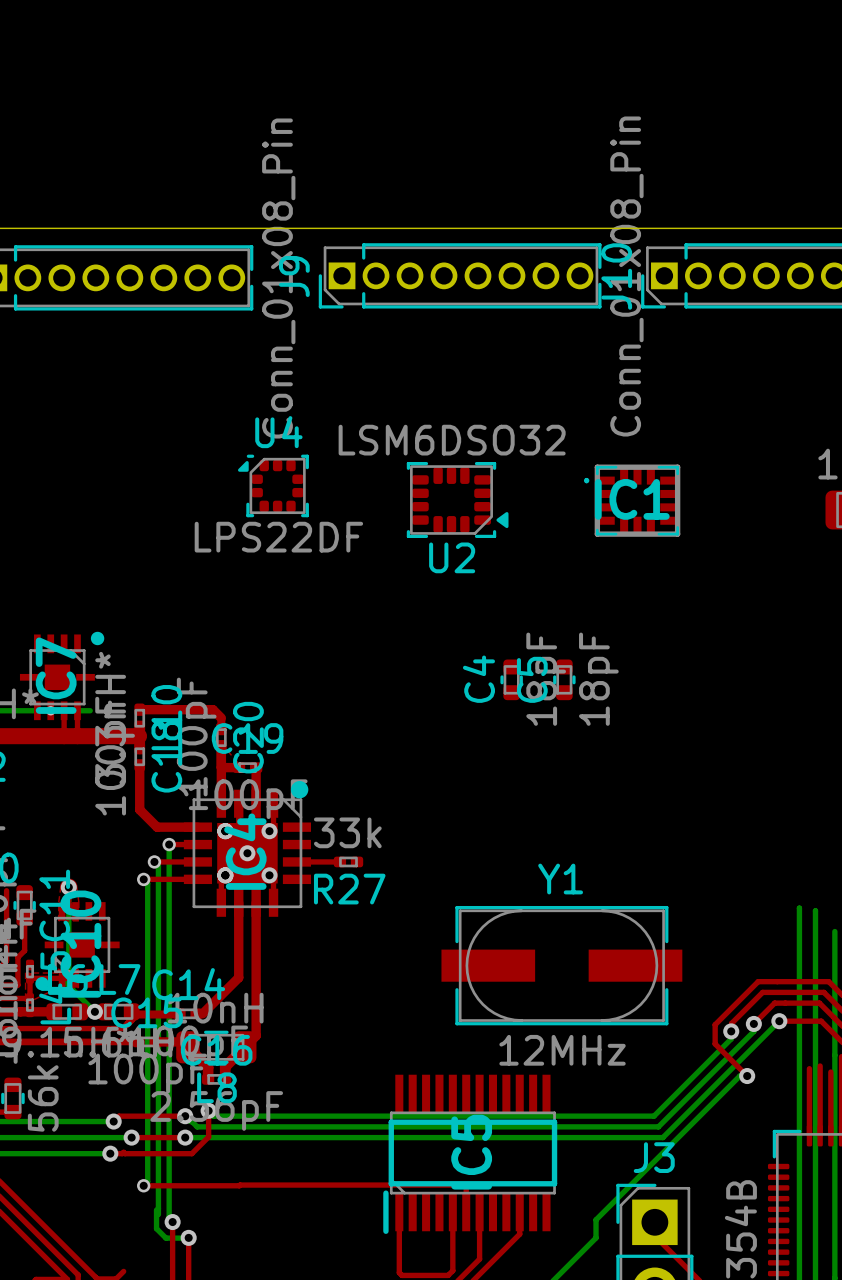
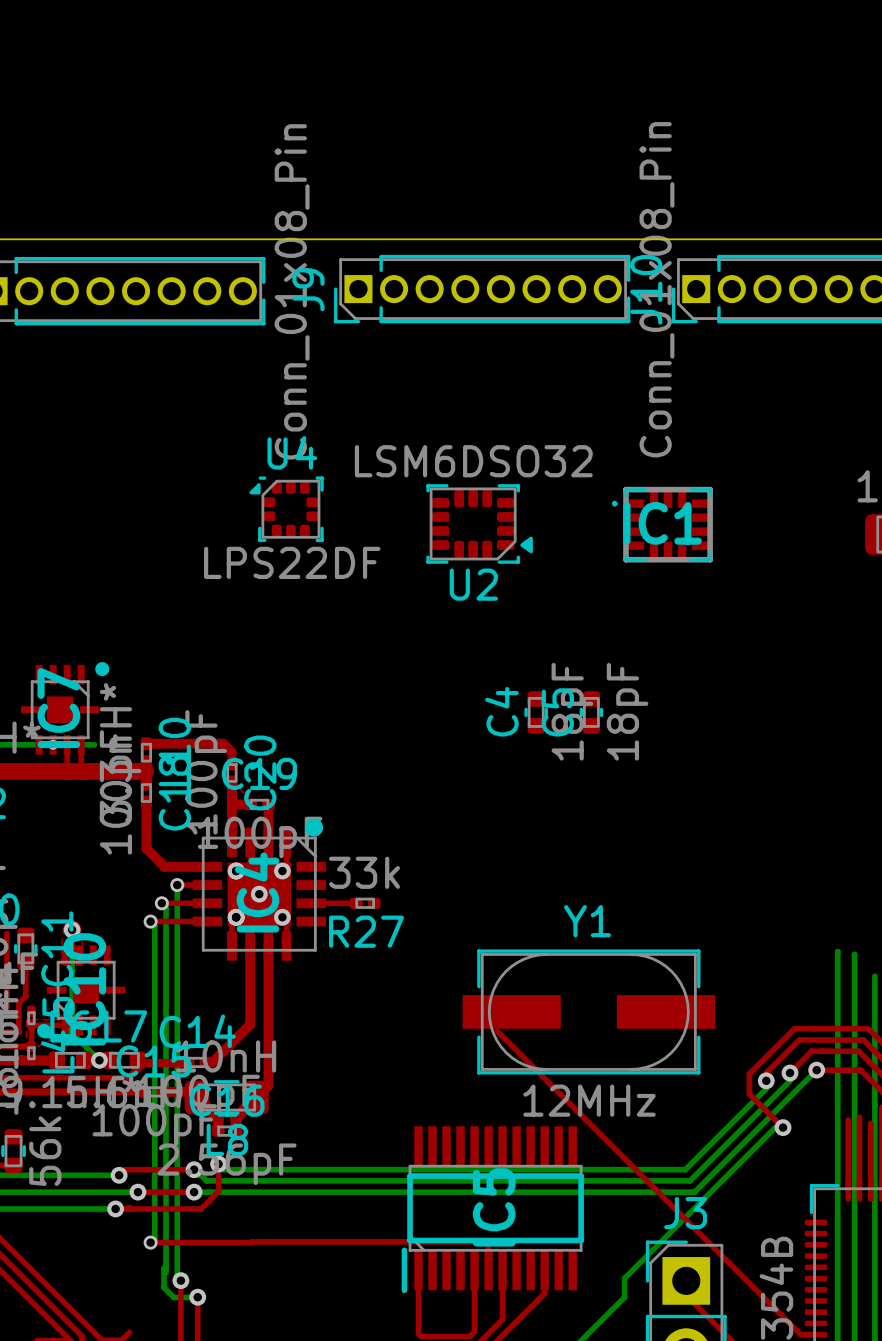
top track: none -> (496, 1030) (800, 1334) (815, 1334)

